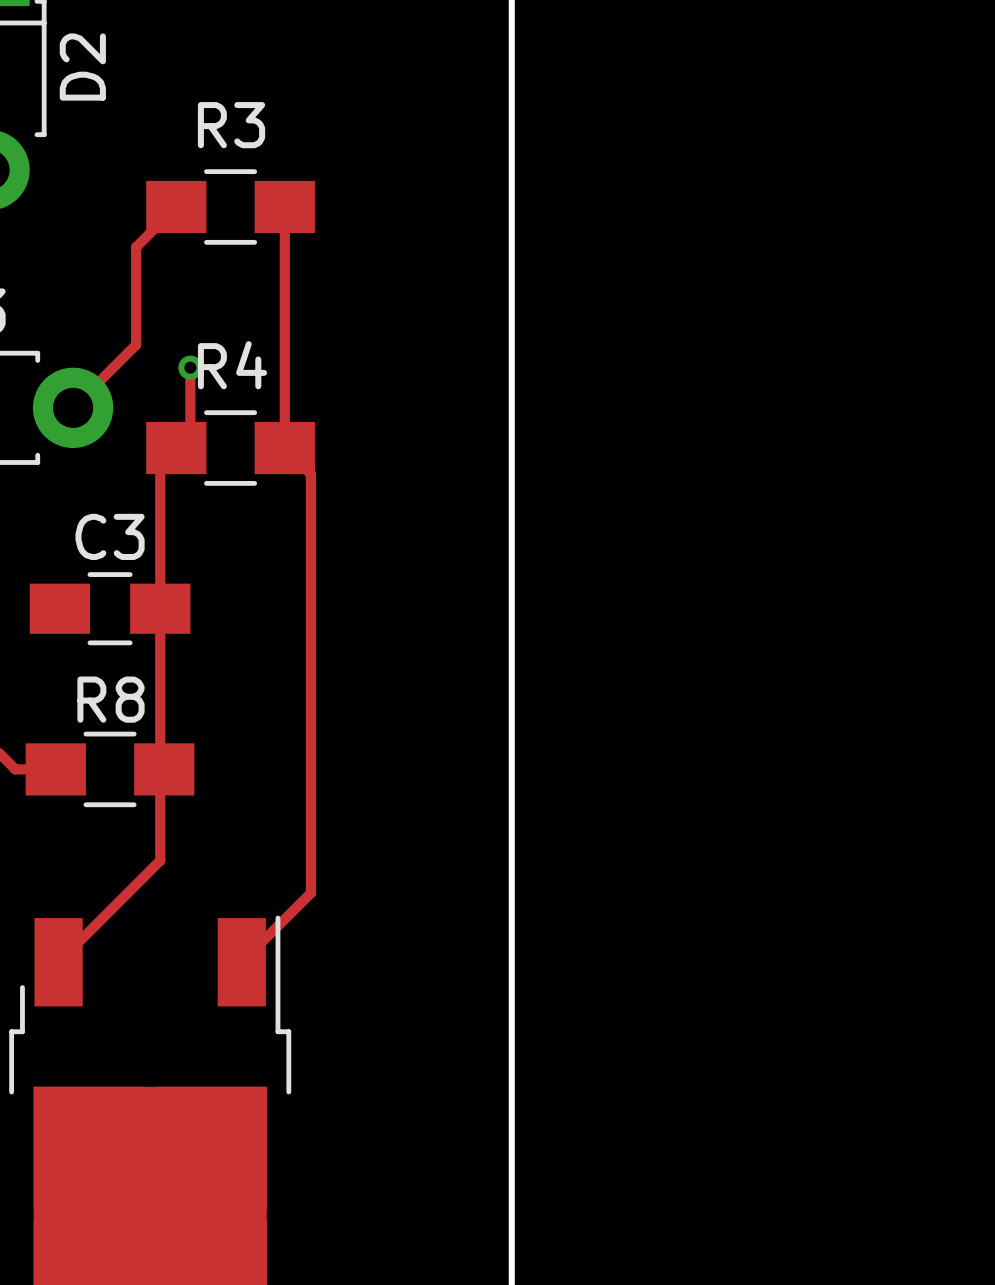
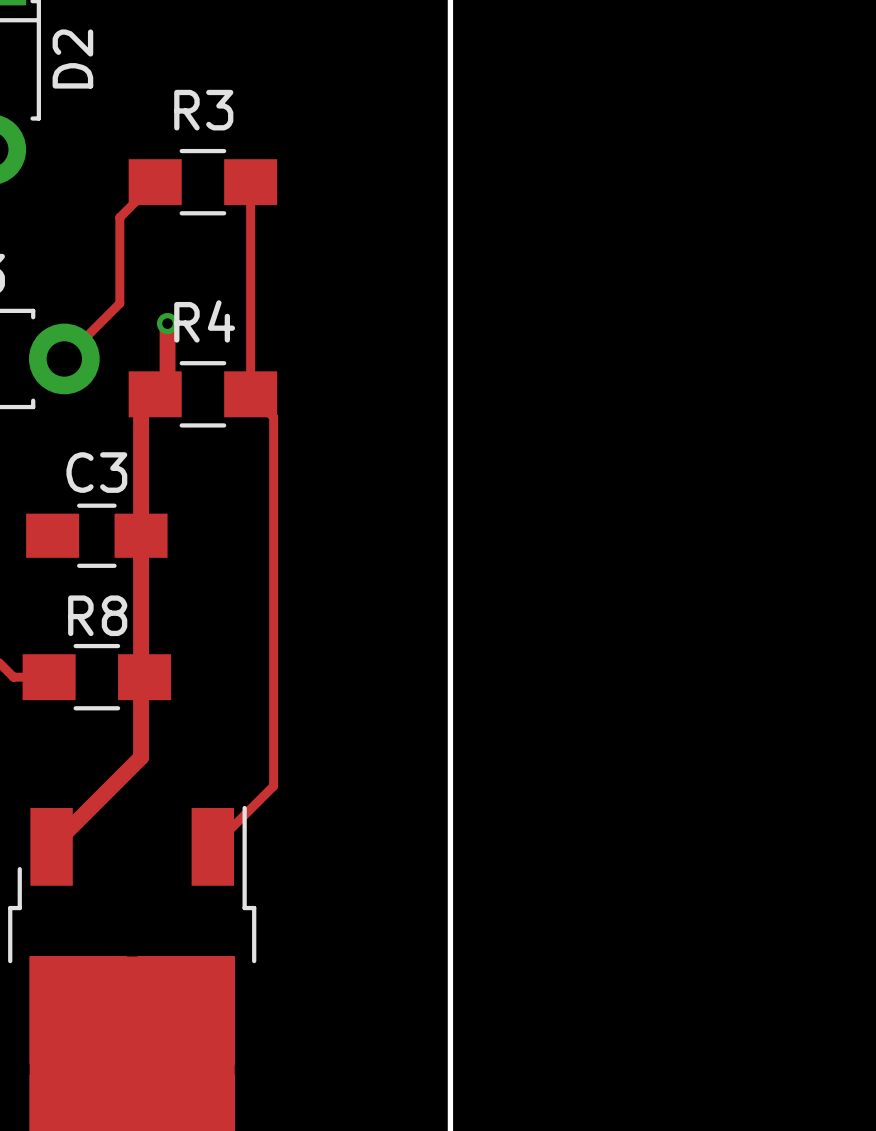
track width: thin (190, 367) (190, 433) (160, 464) (160, 860) (58, 962) -> thick (167, 323) (167, 381) (141, 408) (141, 757) (51, 846)

